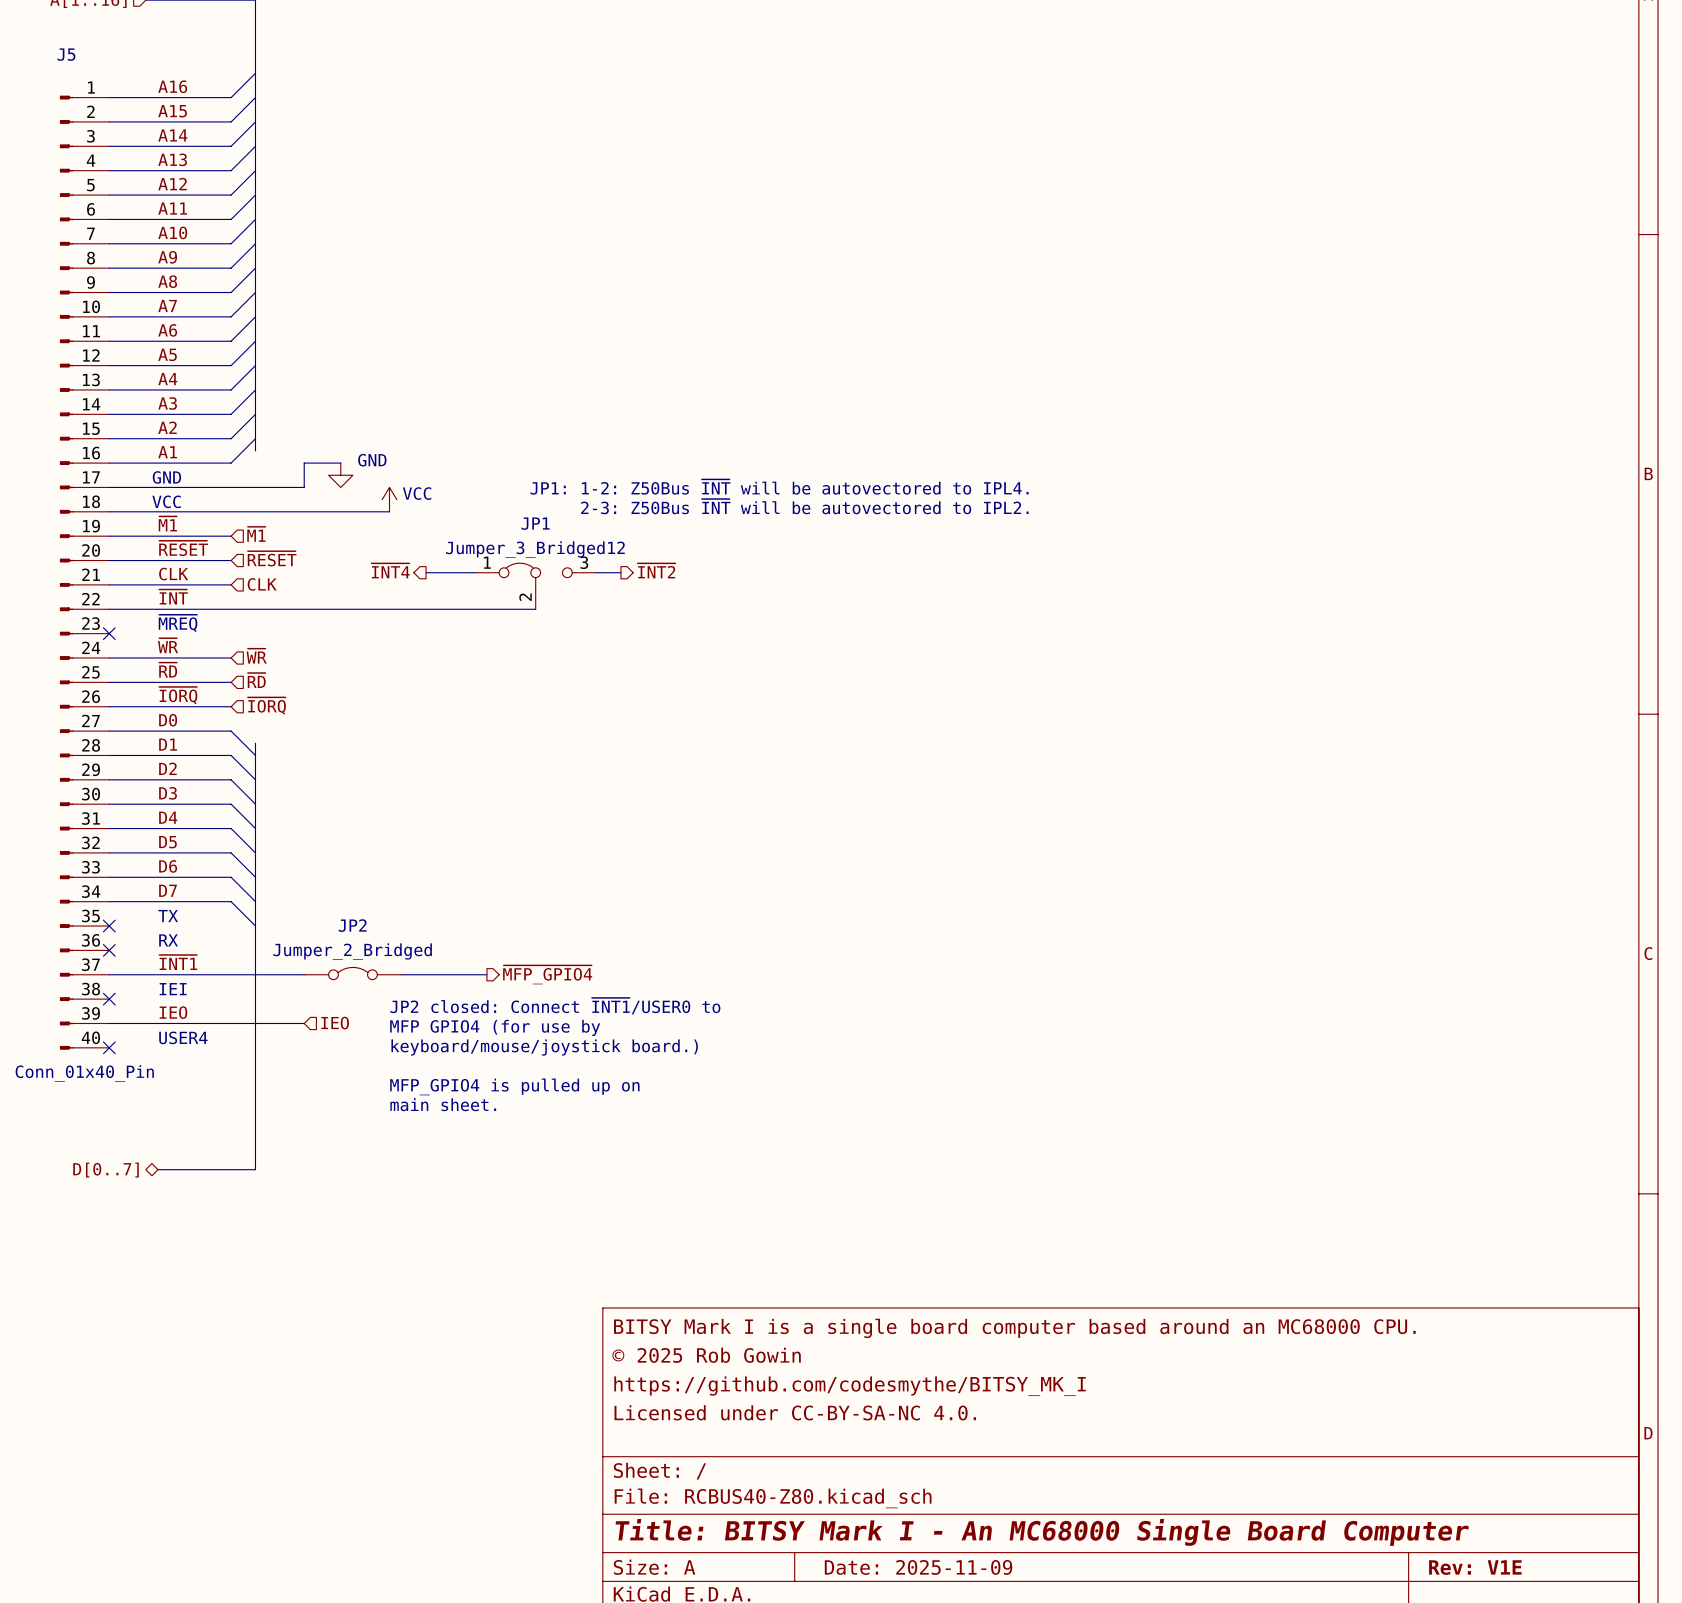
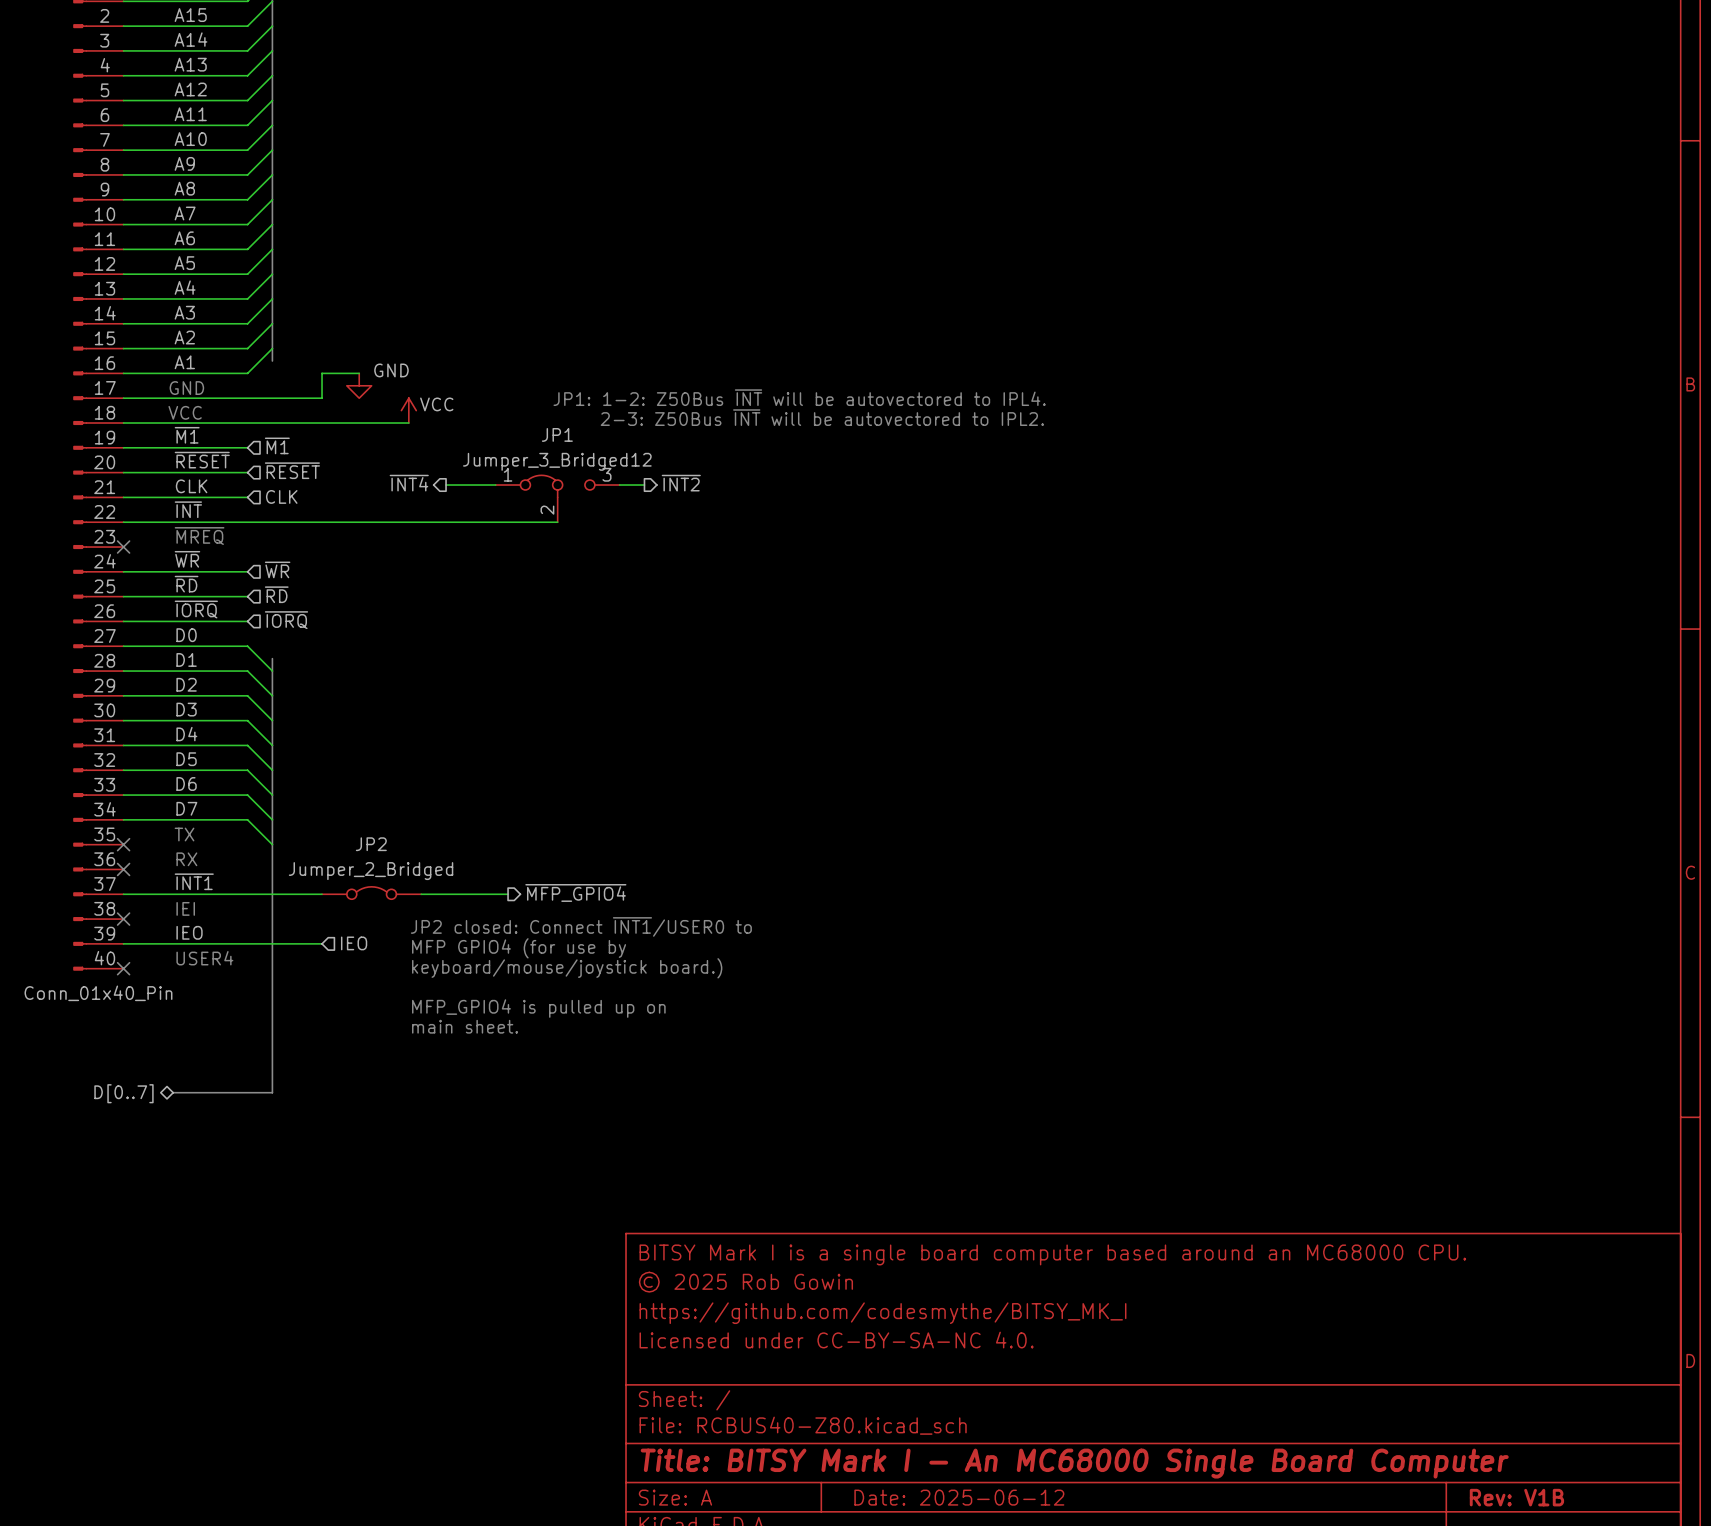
title block: Date: 2025-11-09 (918, 1567) -> Date: 2025-06-12 (959, 1497)
title block: Rev: V1E (1475, 1567) -> Rev: V1B (1516, 1497)

